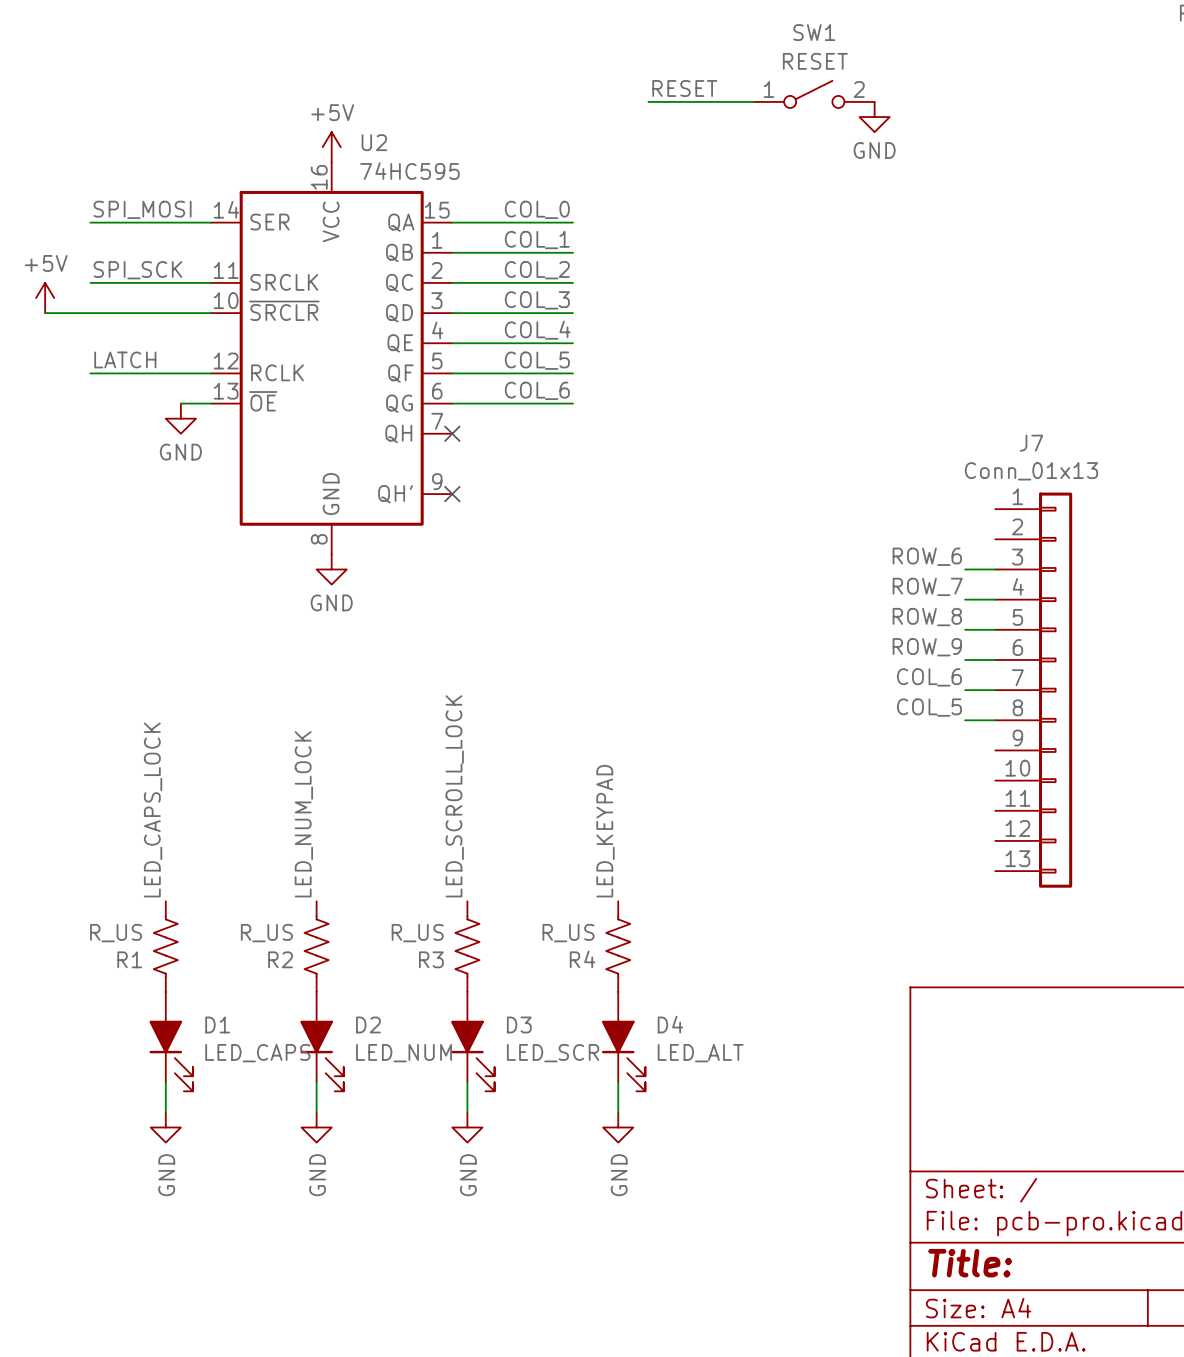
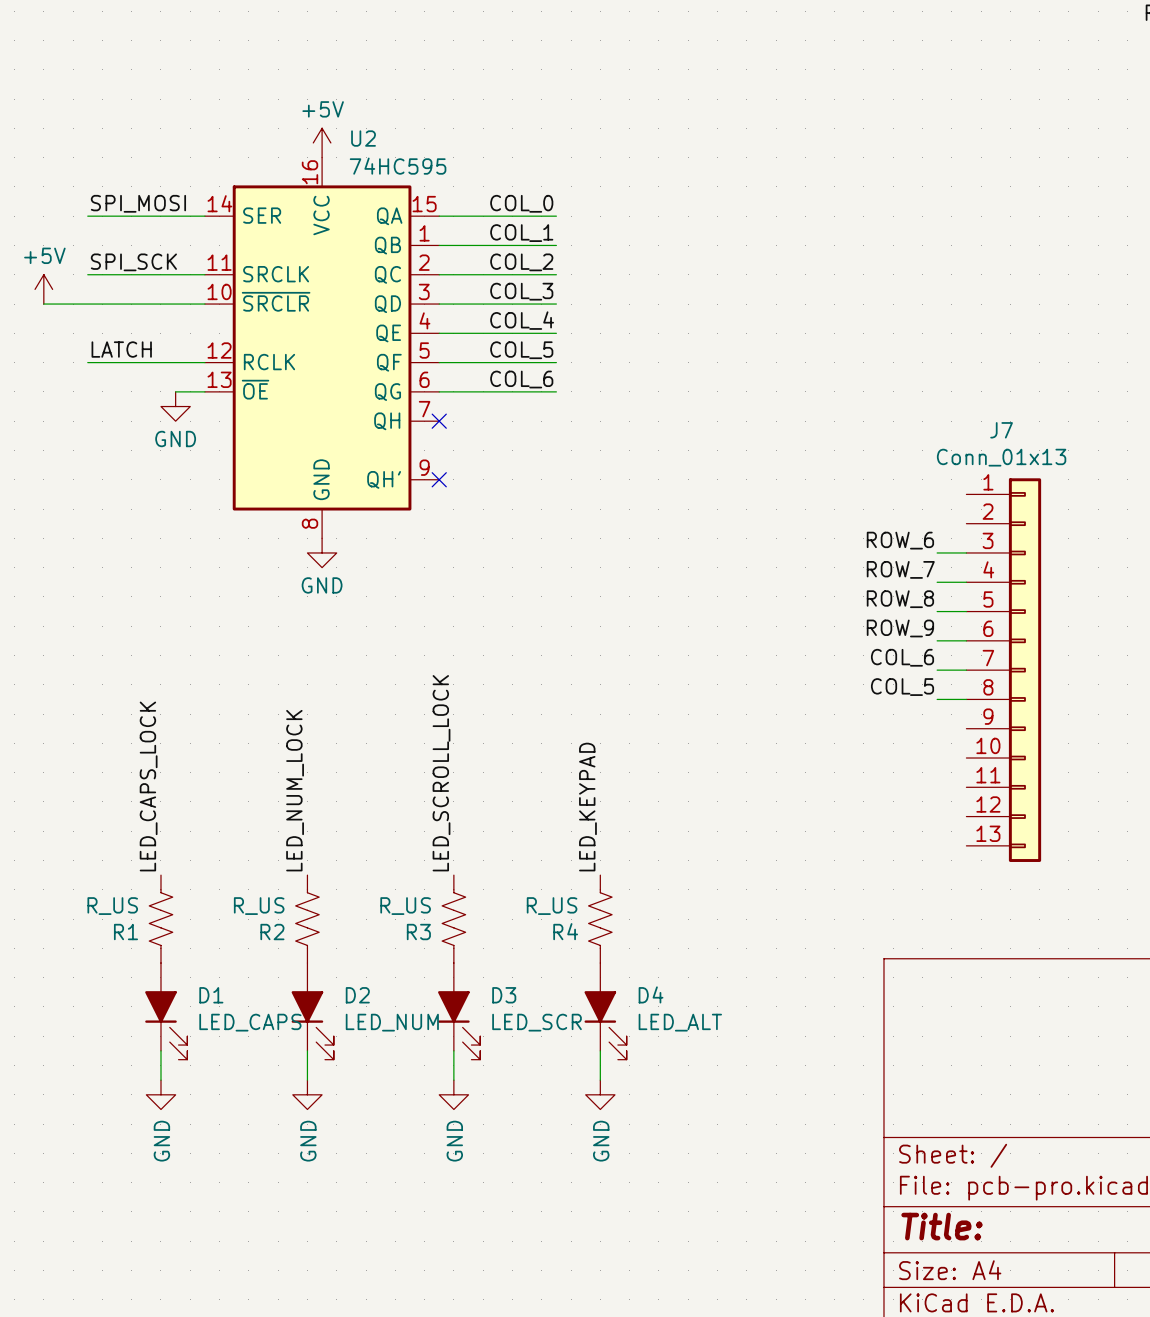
label: RESET (684, 88) -> none
SW1: RESET (814, 94) -> none
wire: (648, 101) (753, 101) -> none
power symbol: GND (874, 117) -> none

